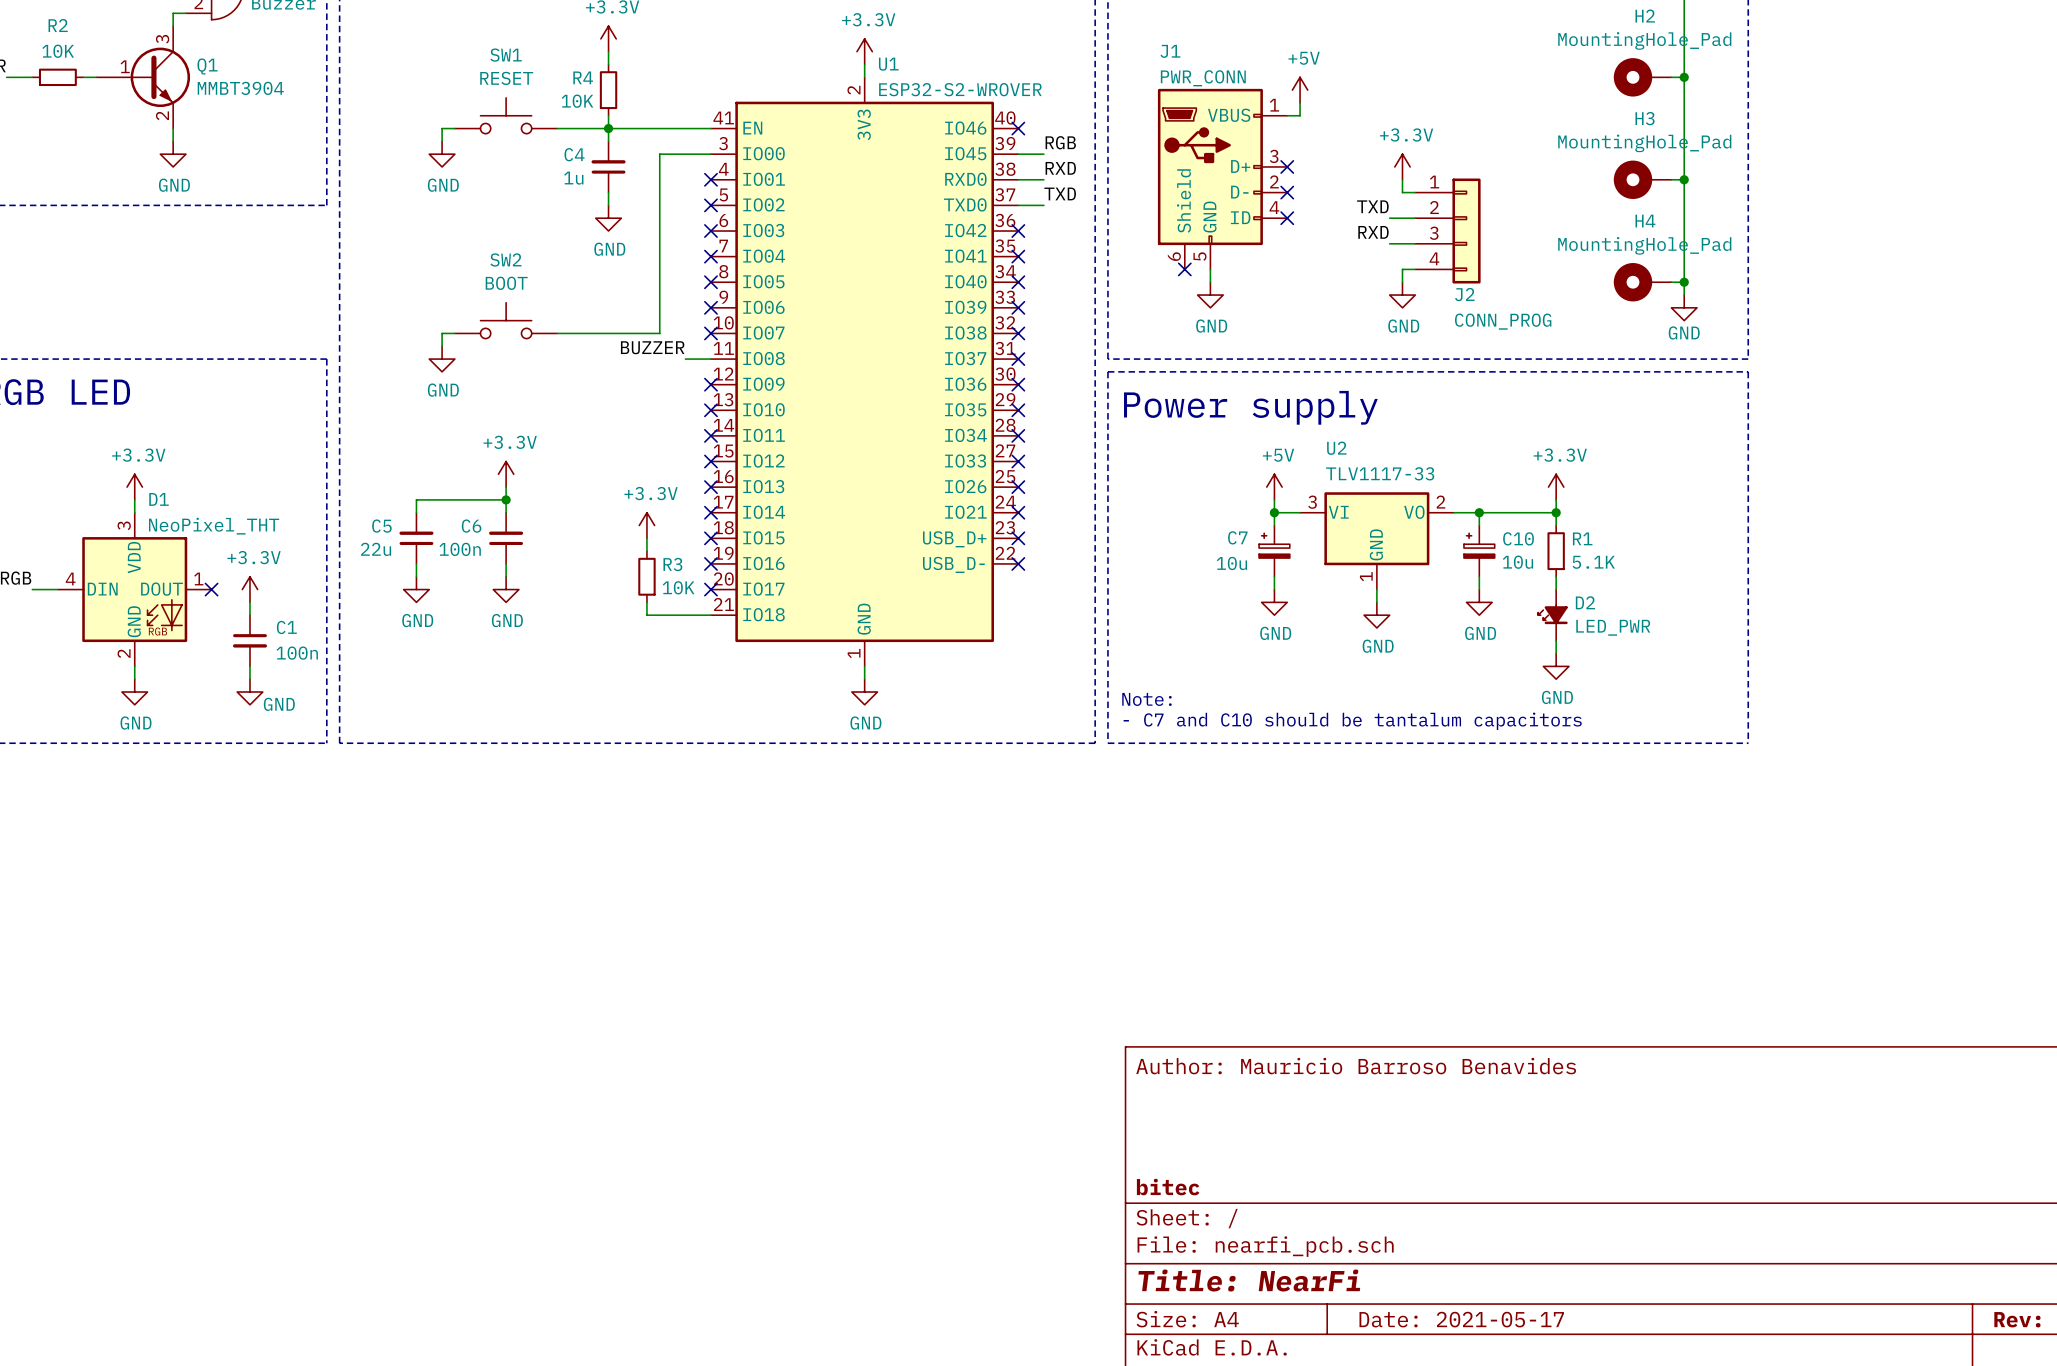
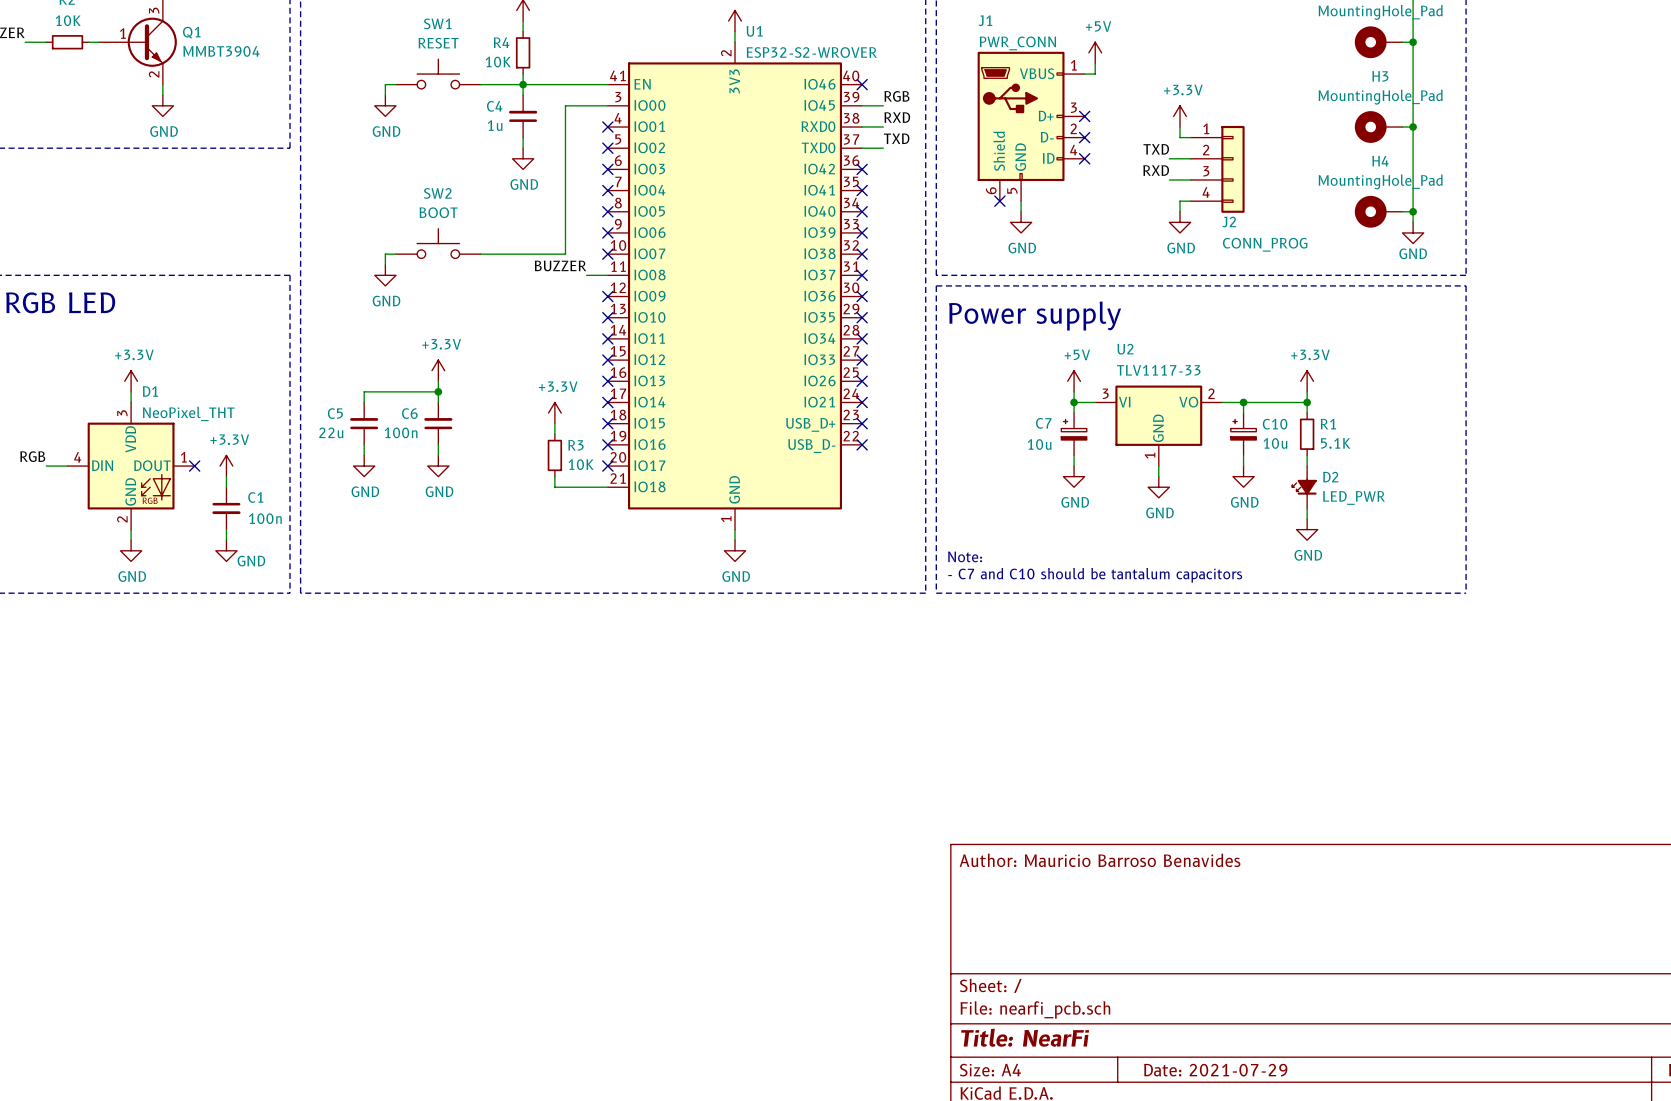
title block: bitec (1168, 1187) -> none
title block: Date: 2021-05-17 (1461, 1319) -> Date: 2021-07-29 (1215, 1070)

